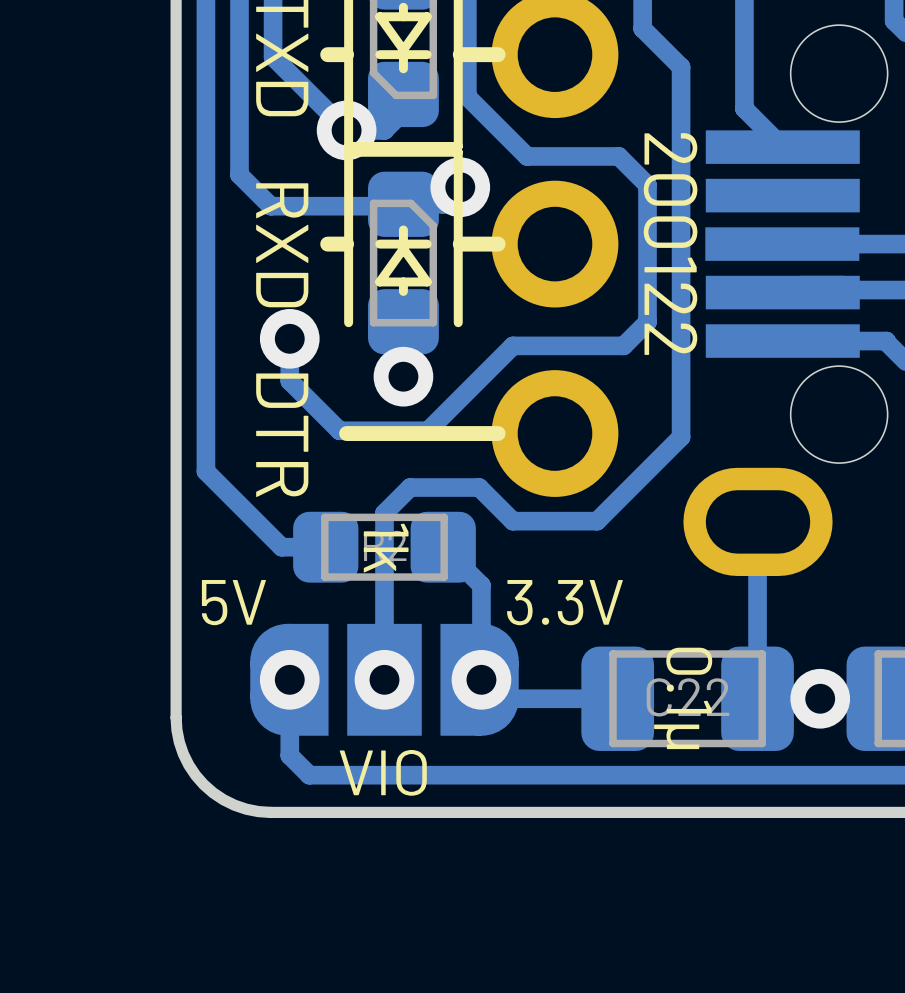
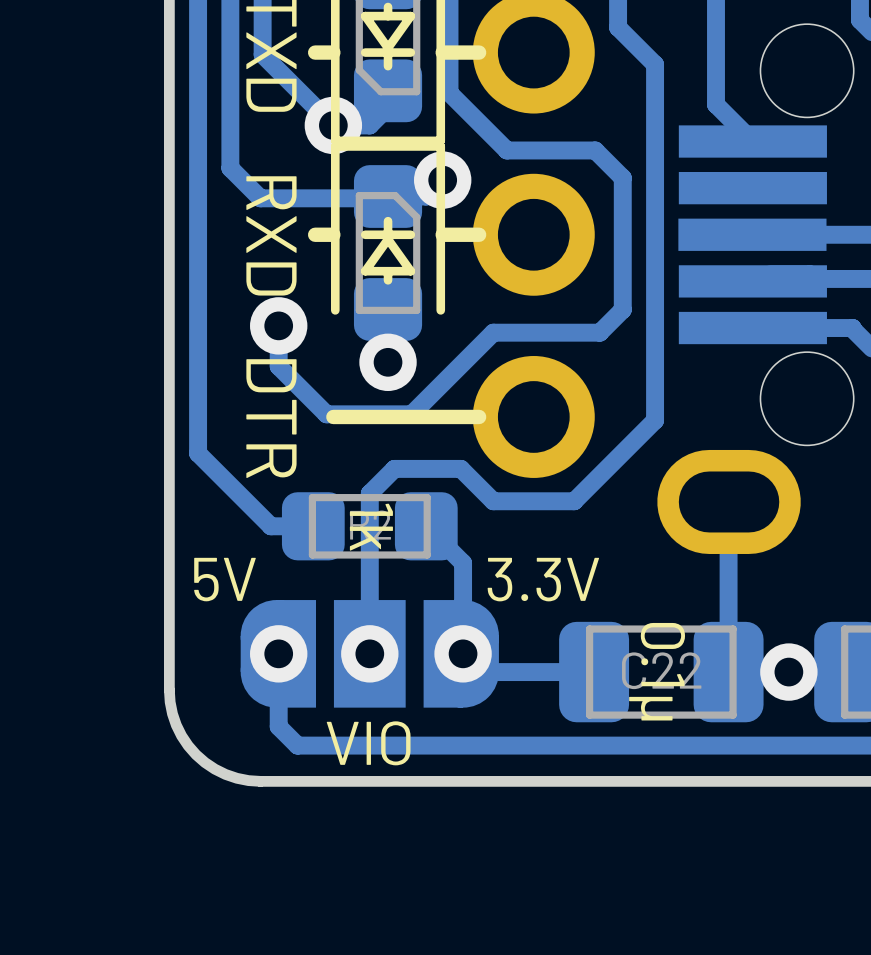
text: 200122 (670, 244) -> none

